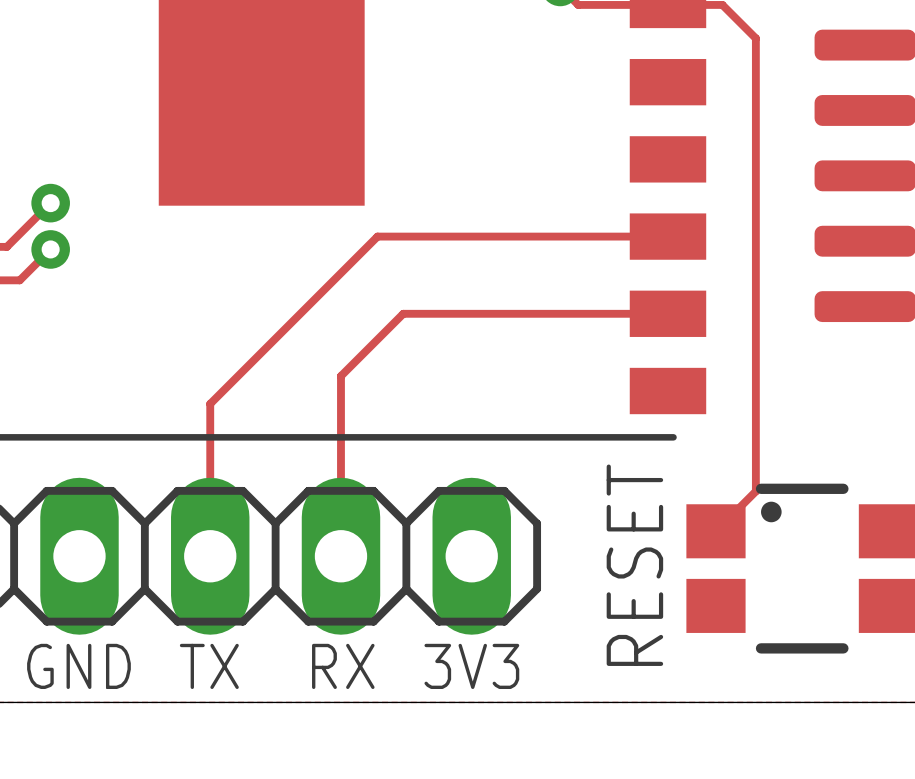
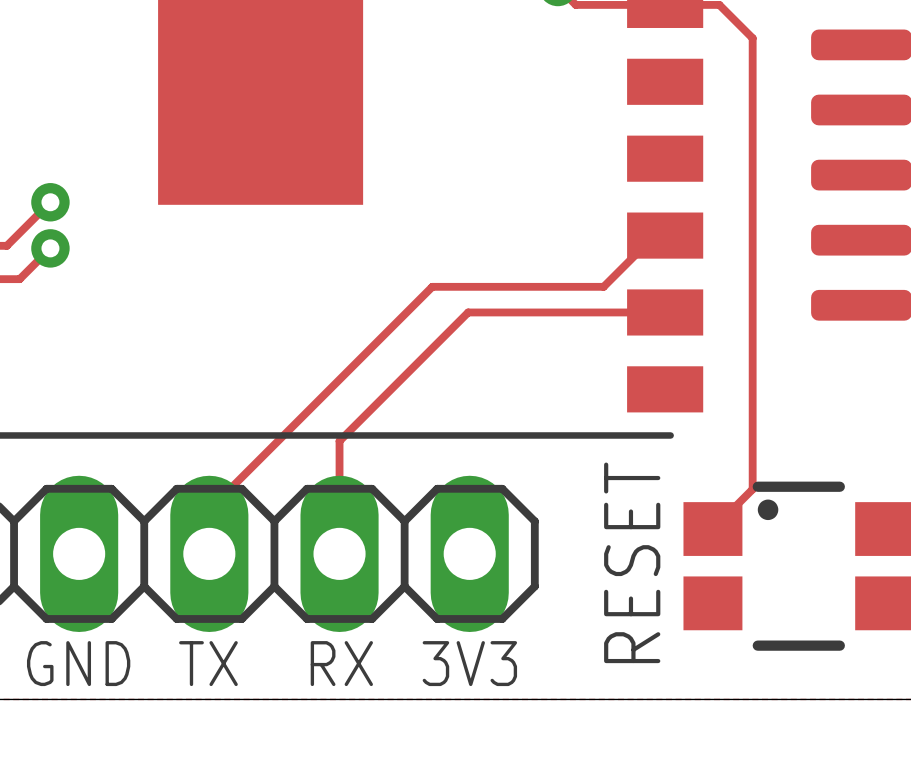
track: (657, 236) (377, 236) (210, 403) (210, 511) -> (654, 235) (603, 286) (432, 286) (209, 509)
track: (470, 313) (403, 313) (340, 376) (340, 443) -> (468, 312) (339, 441)

